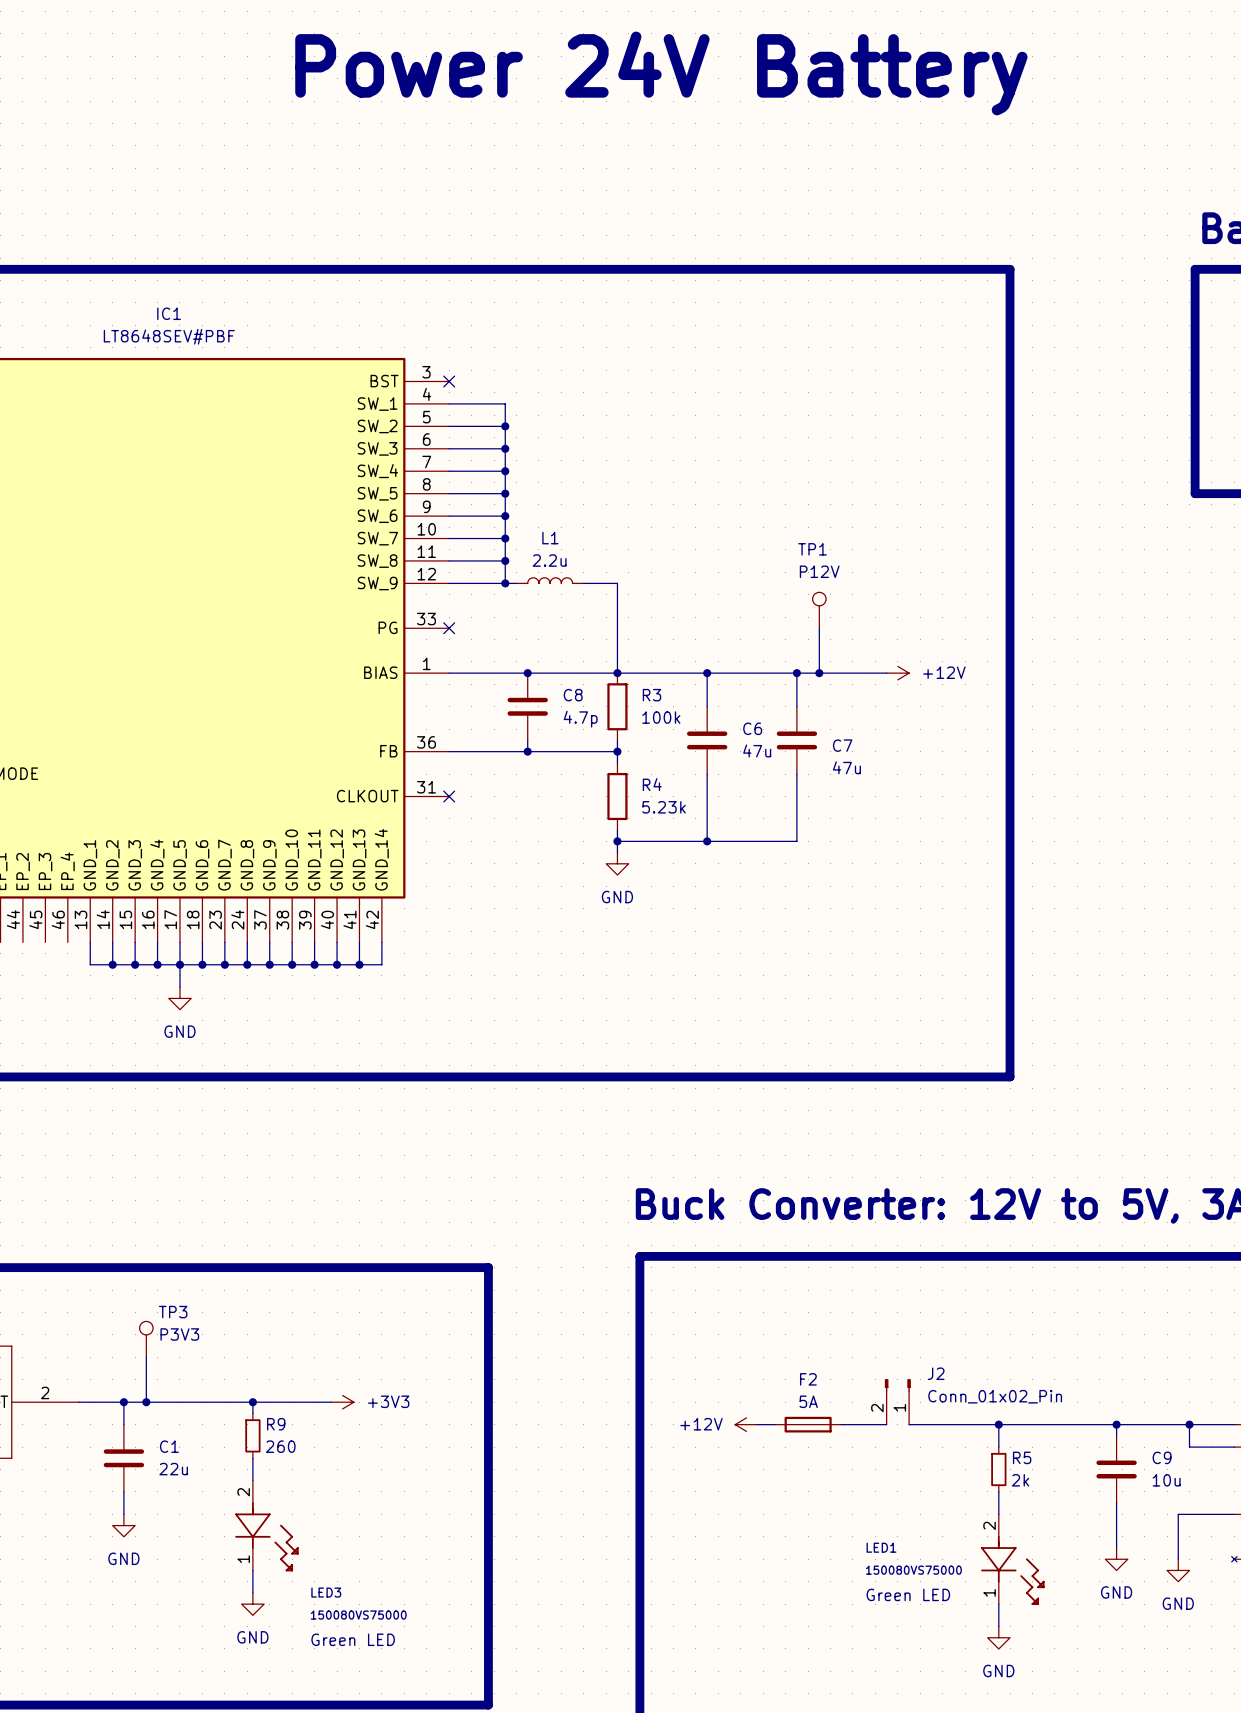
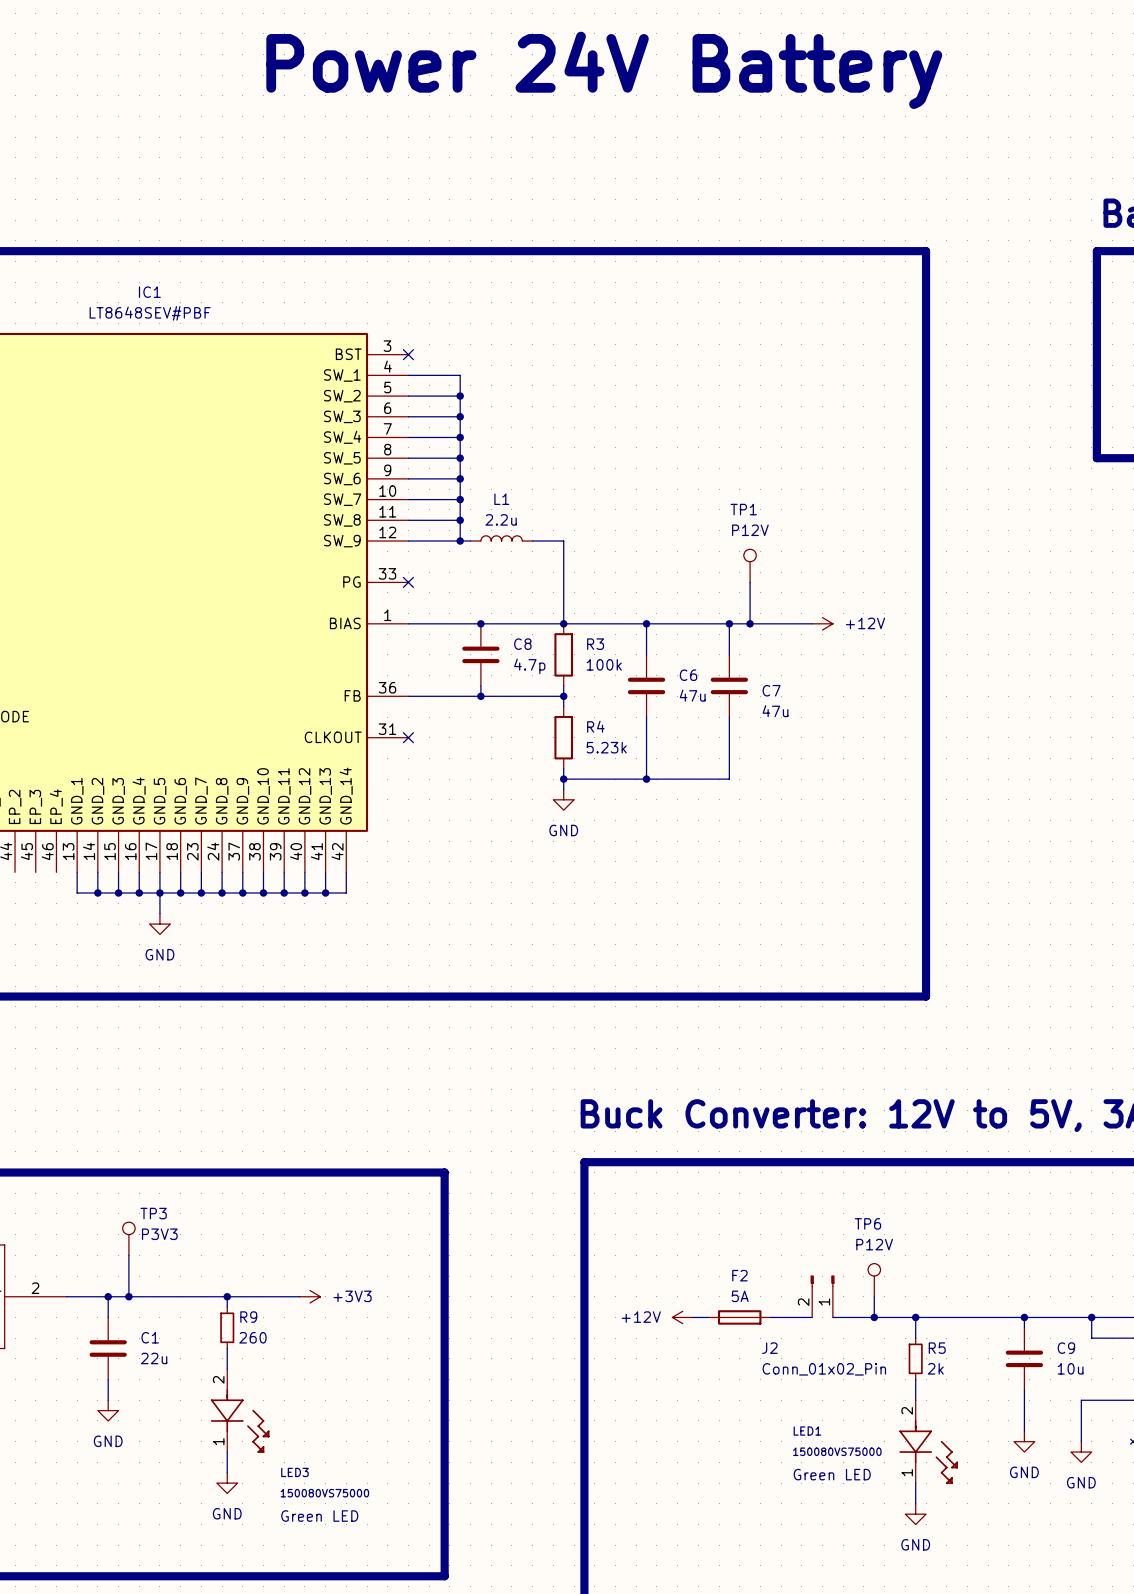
J2 name position: J2 (936, 1373) -> J2 (769, 1348)
TP6: none -> P12V (874, 1280)
J2 value position: Conn_01x02_Pin (995, 1396) -> Conn_01x02_Pin (824, 1369)
wire: none -> (874, 1296) (874, 1317)
junction: none -> (874, 1317)

